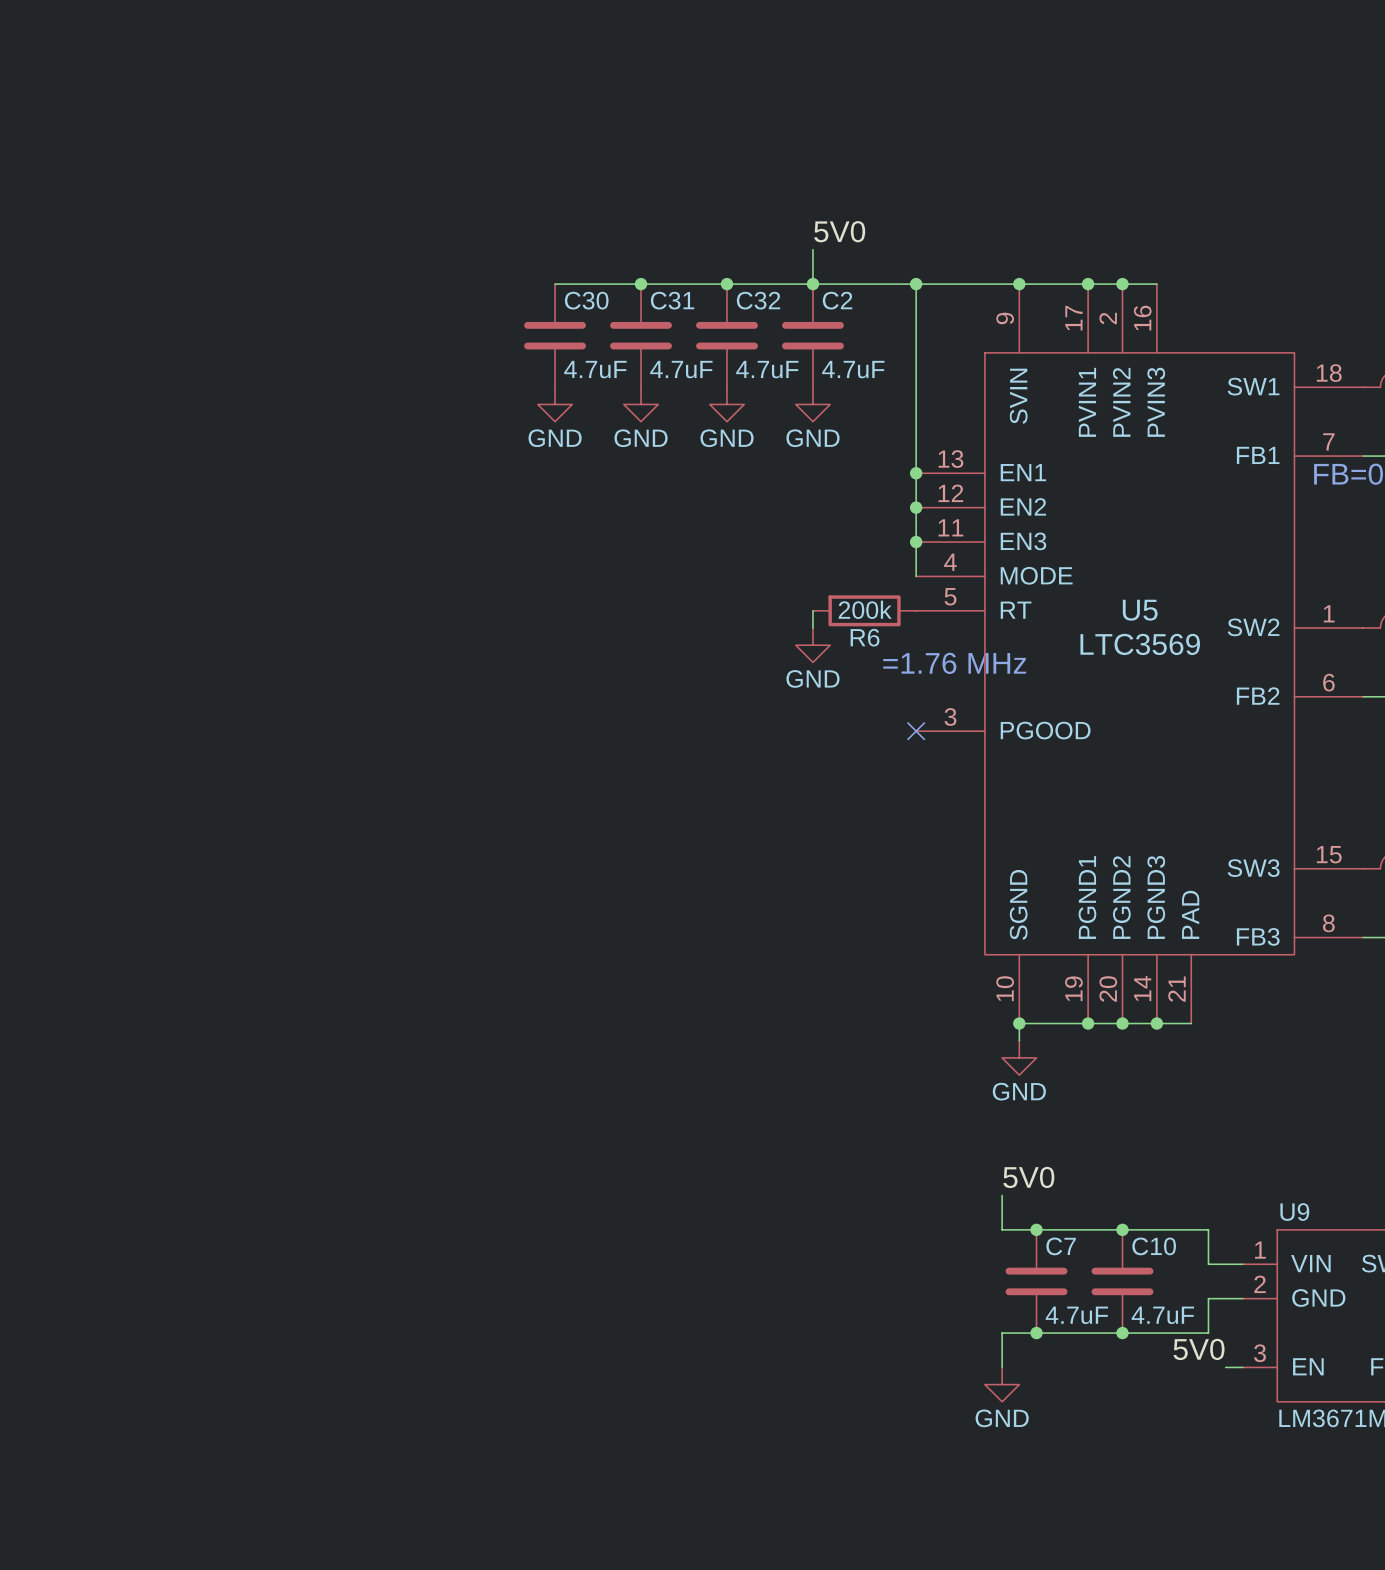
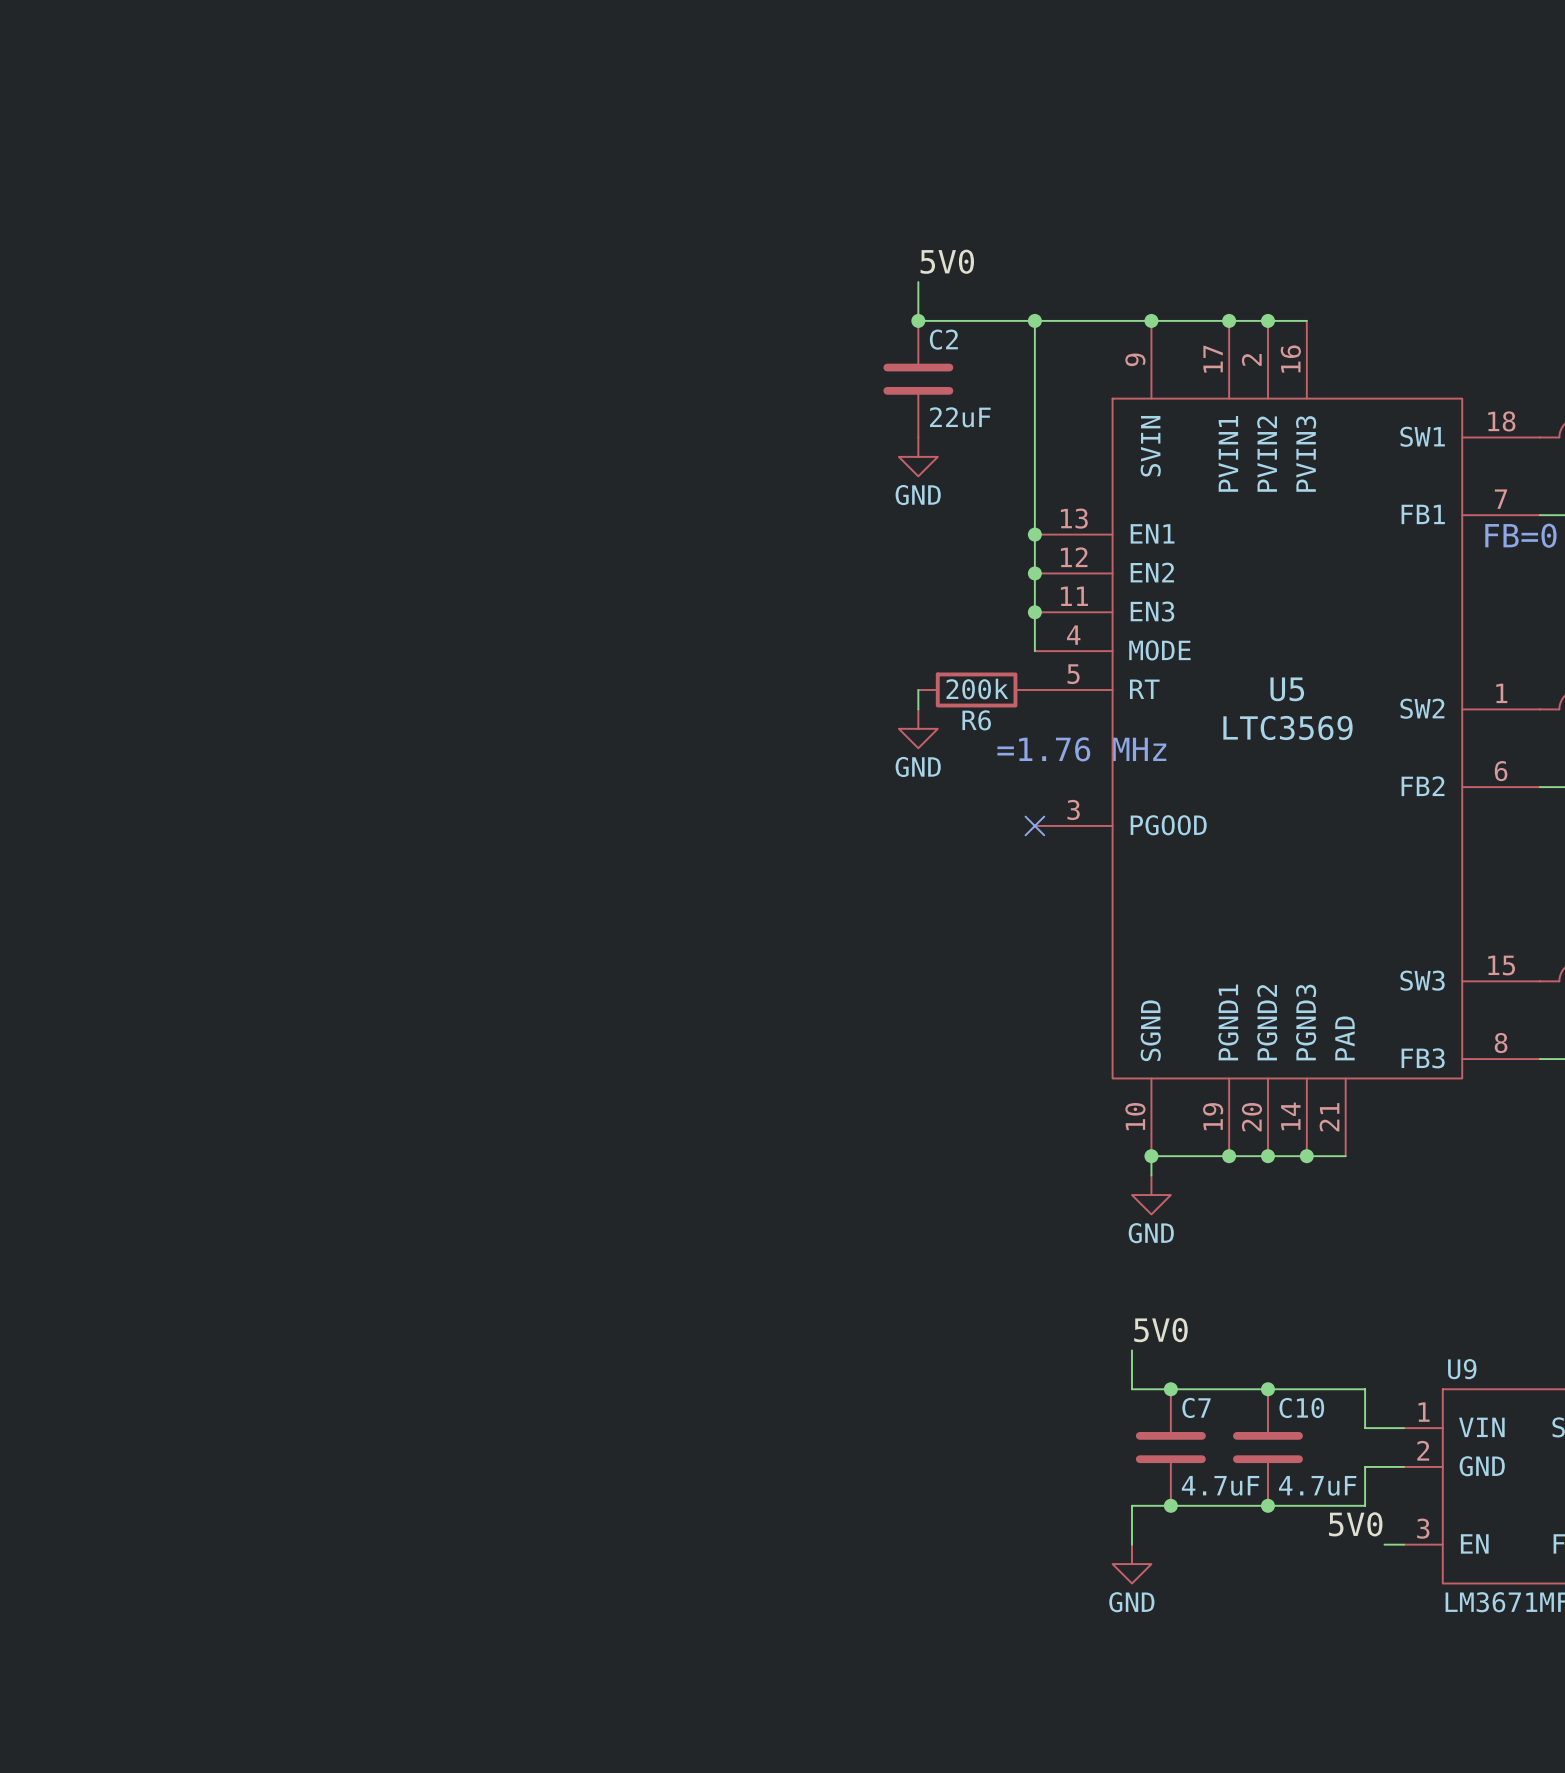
wire: (555, 284) (812, 284) -> none
junction: (641, 284) -> none
junction: (727, 284) -> none
C30: 4.7uF (555, 335) -> none
C31: 4.7uF (641, 335) -> none
C32: 4.7uF (727, 335) -> none
C2 value: 4.7uF (853, 369) -> 22uF (960, 417)
power symbol: GND (555, 404) -> none
power symbol: GND (641, 404) -> none
power symbol: GND (727, 404) -> none

